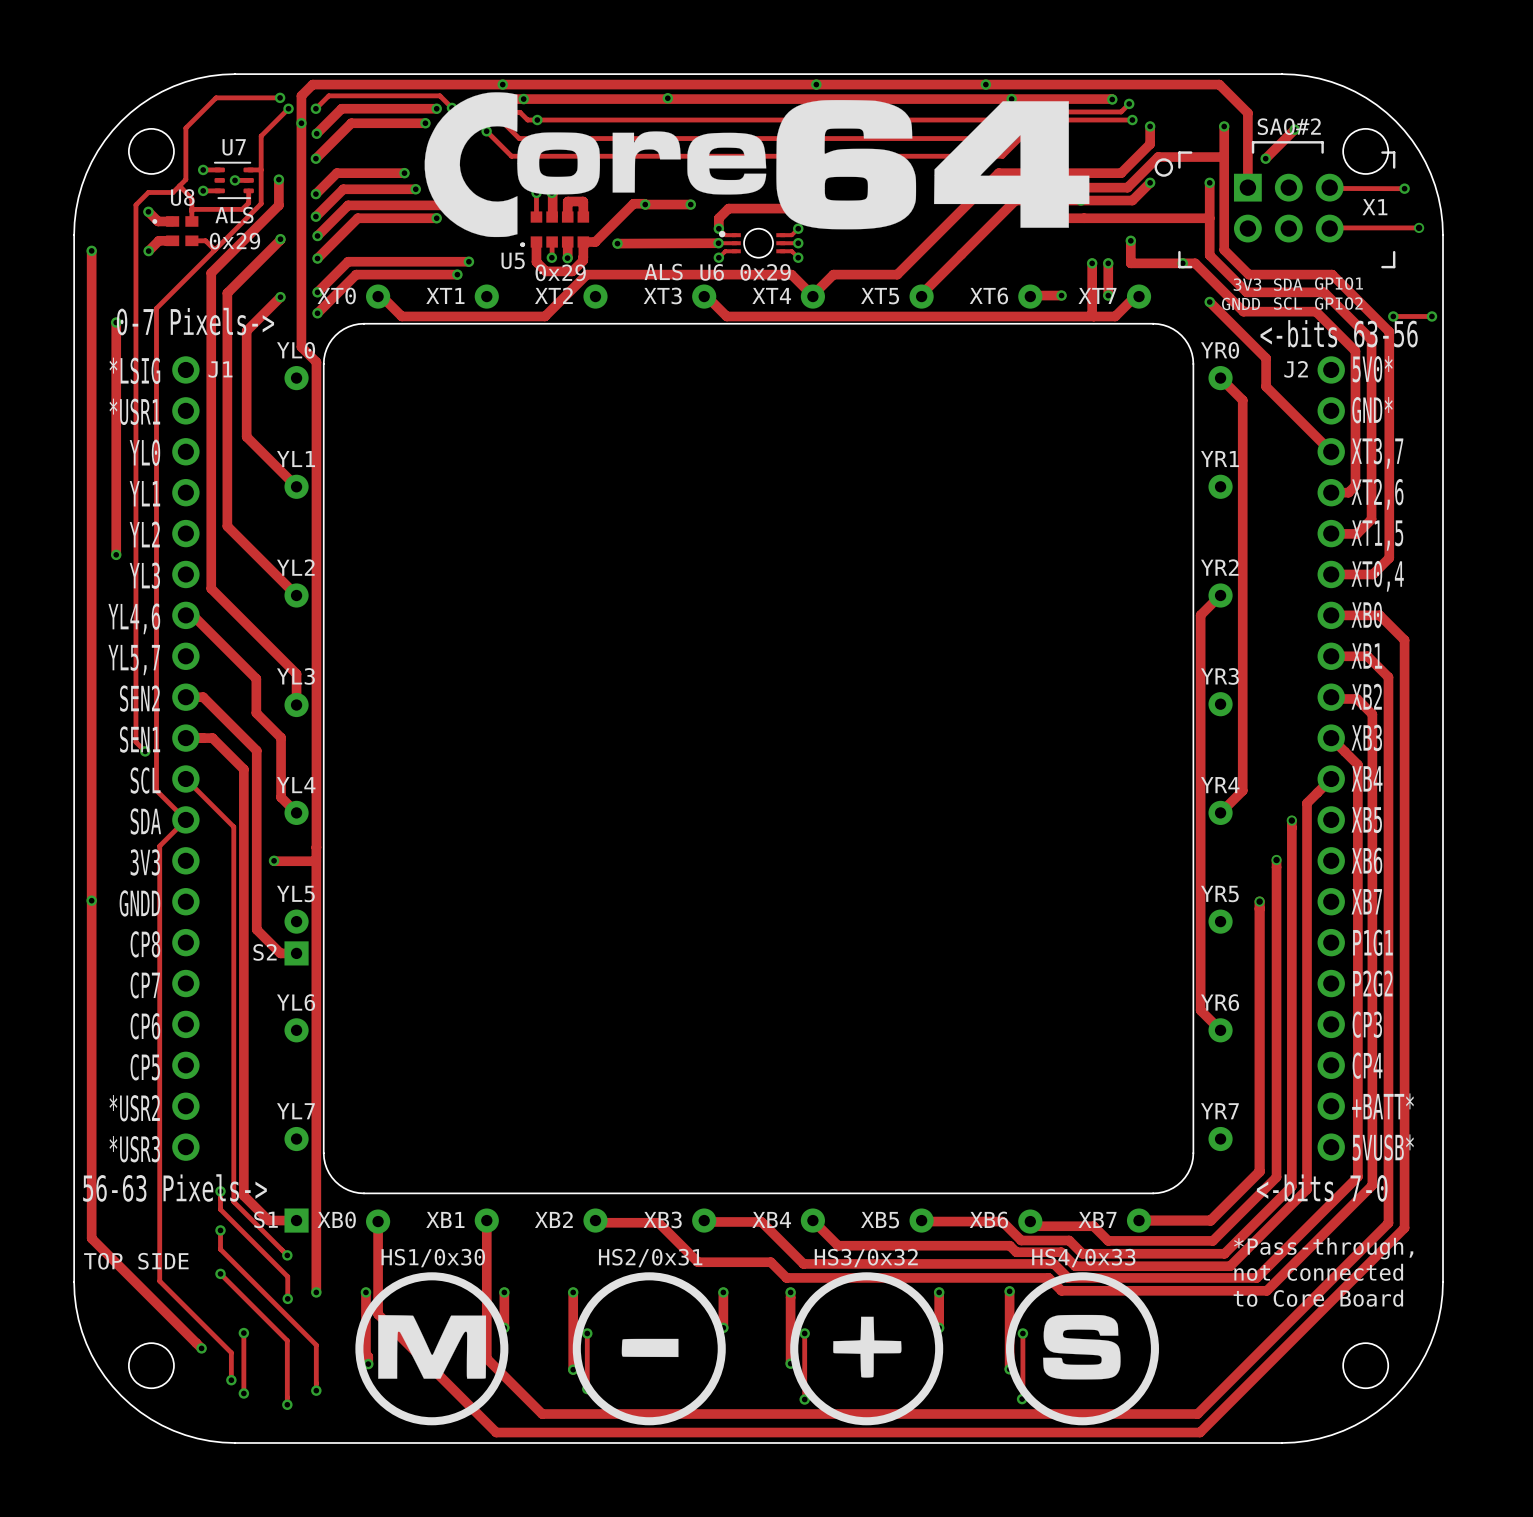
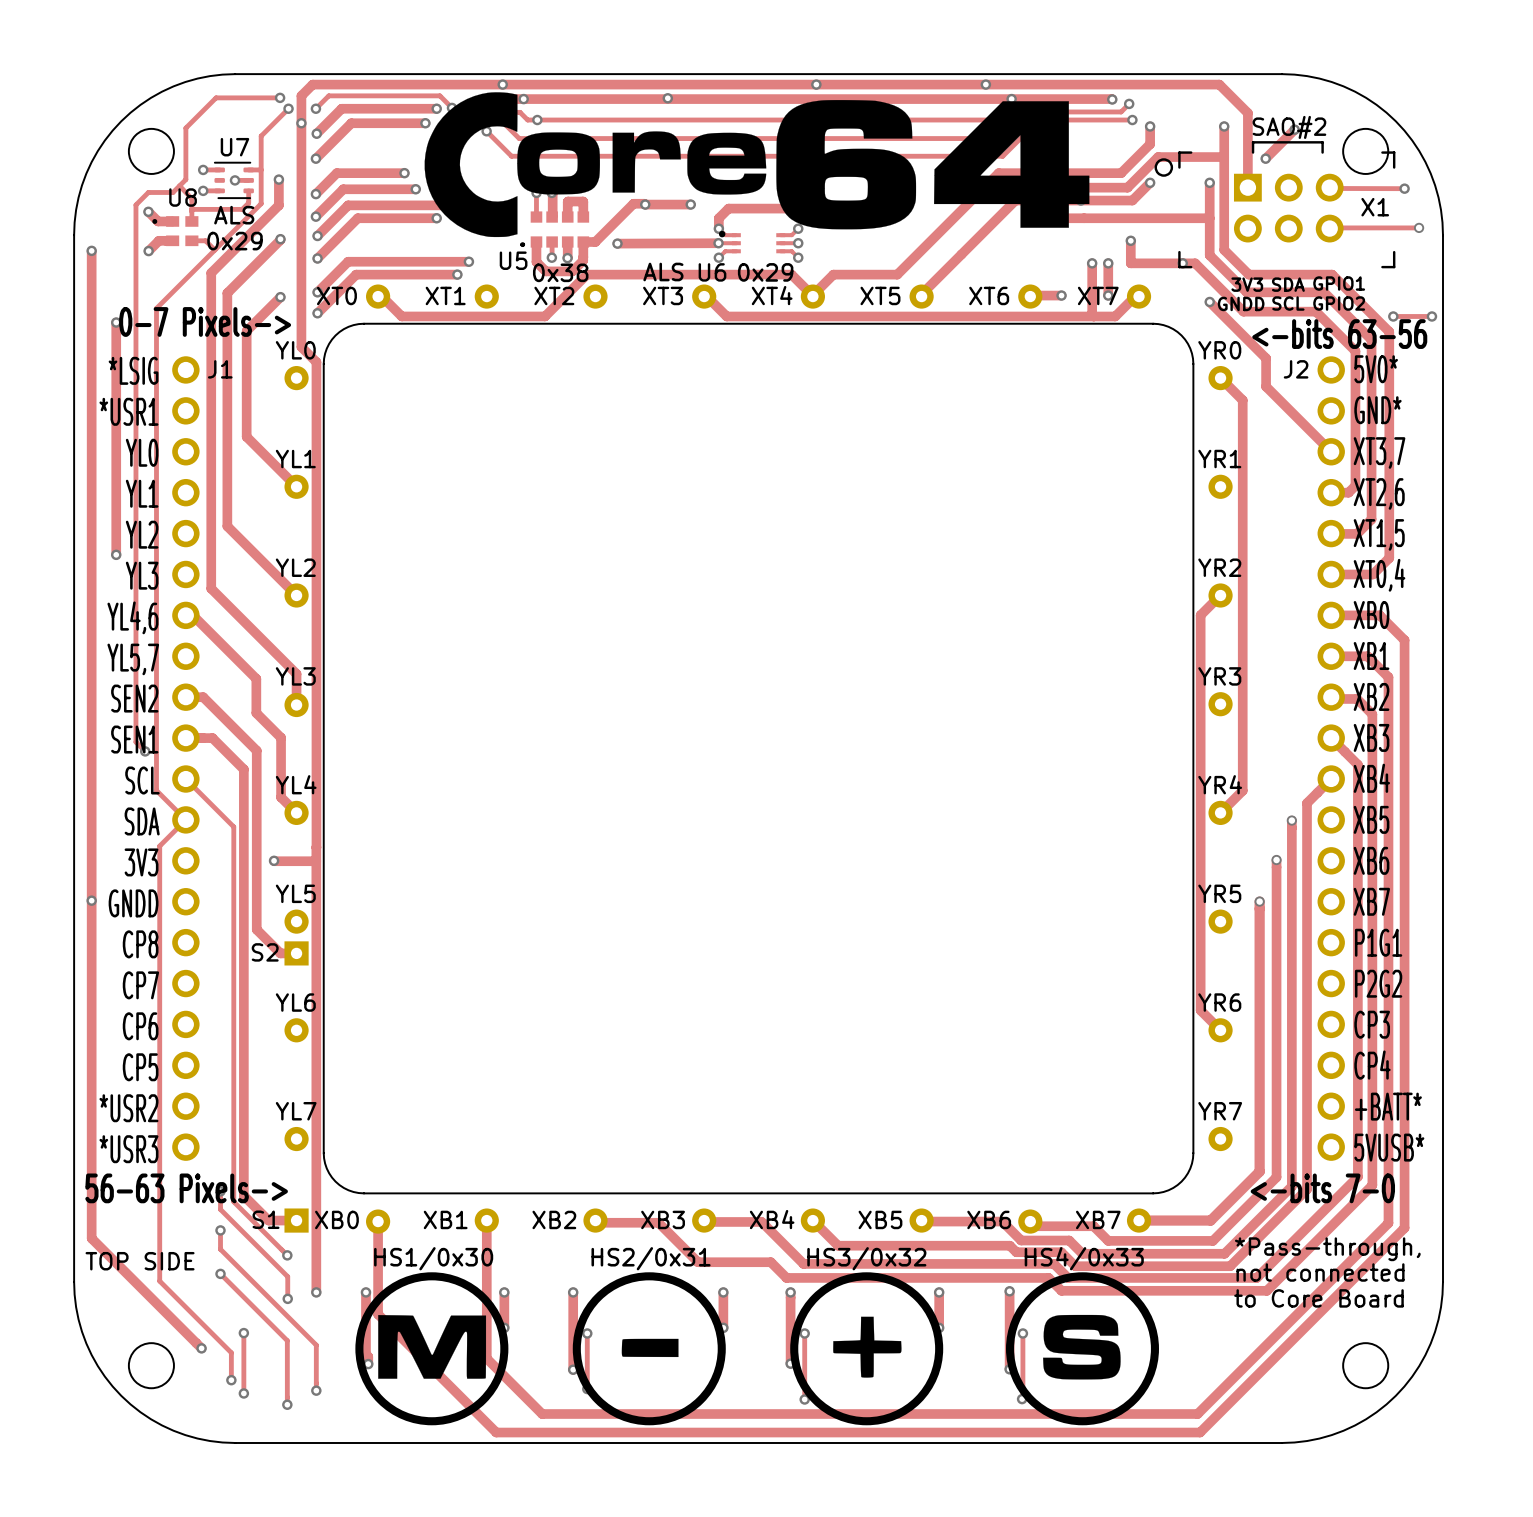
round board edge: [743, 228, 774, 259] -> none
text: 0x29 (560, 272) -> 0x38 (560, 272)

